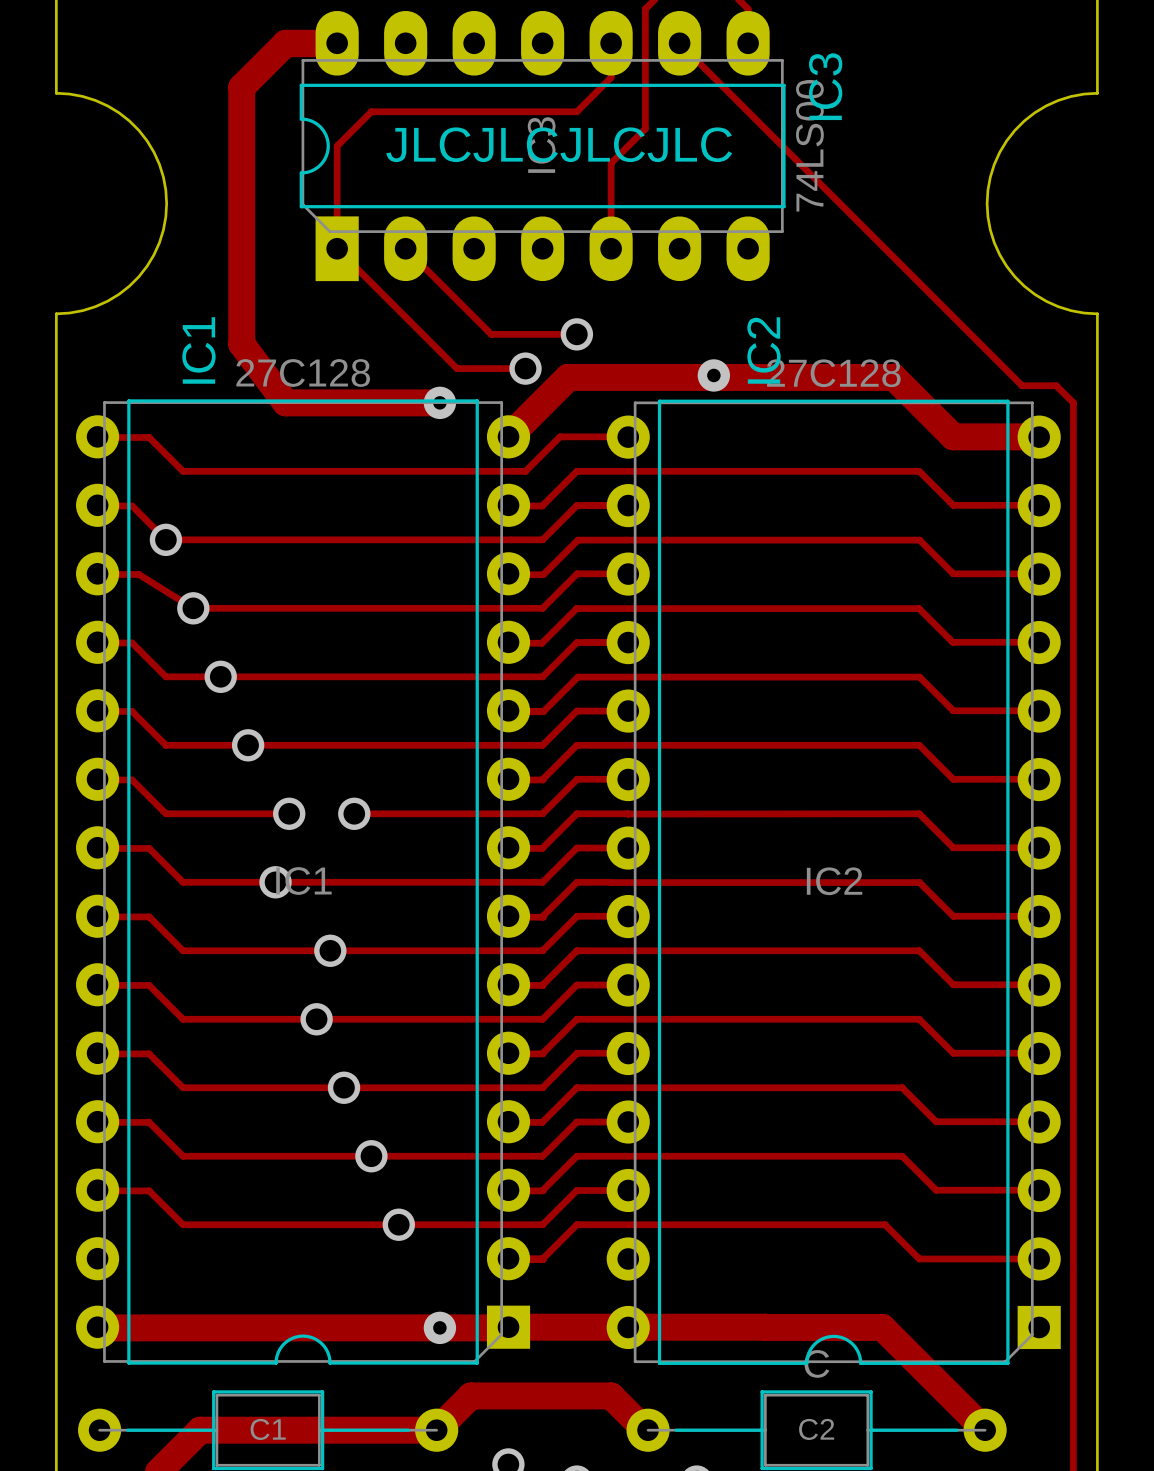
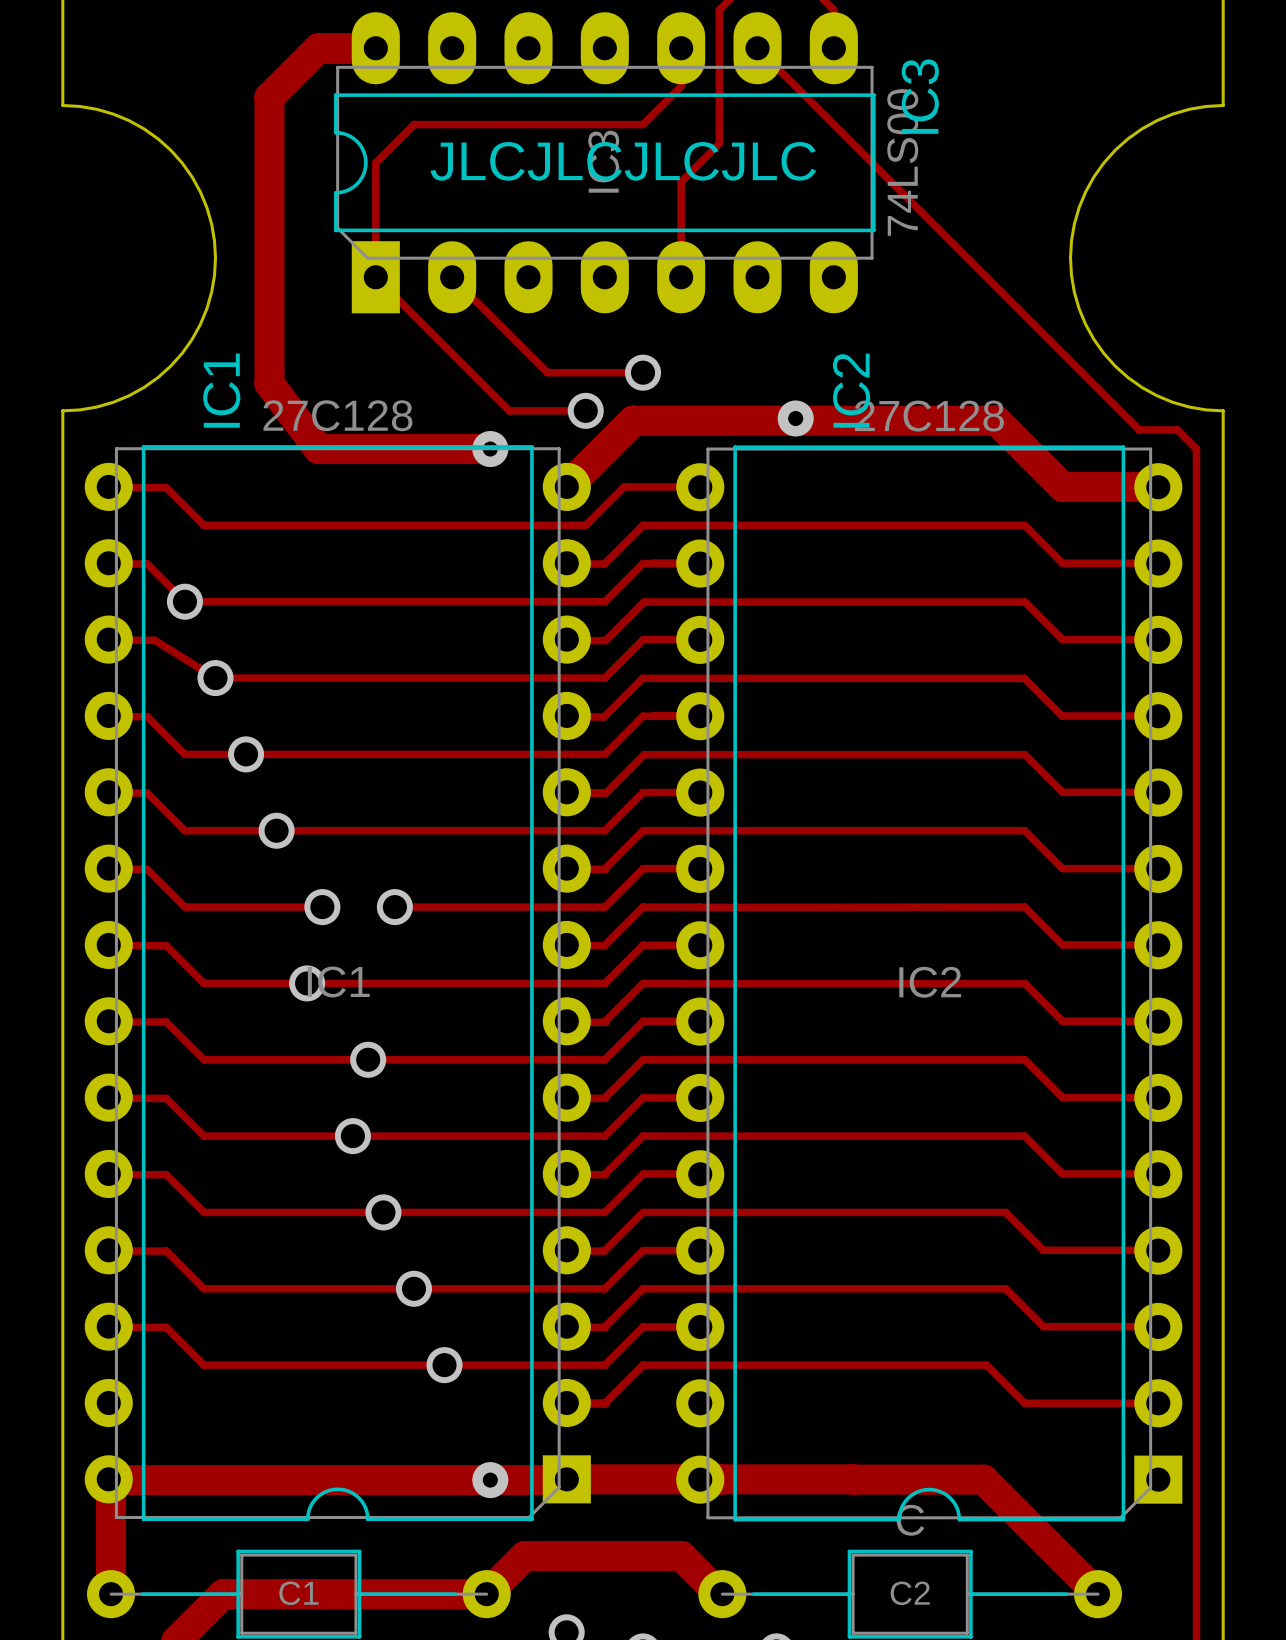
board edge: (56, 93) (82, 96) (107, 105) (119, 112) (138, 130) (154, 152) (159, 164) (163, 177) (166, 203) (163, 229) (159, 242) (154, 254) (138, 276) (119, 294) (107, 301) (82, 310) (56, 313) (56, 368) -> (62, 103) (62, 105) (96, 109) (129, 120) (144, 128) (170, 150) (182, 162) (200, 191) (211, 224) (215, 258) (211, 292) (200, 324) (182, 353) (170, 366) (144, 387) (129, 395) (96, 407) (62, 410)
board edge: (1097, 93) (1071, 96) (1046, 105) (1034, 112) (1014, 130) (999, 152) (994, 164) (990, 177) (987, 203) (990, 229) (994, 242) (999, 254) (1014, 276) (1024, 286) (1046, 301) (1071, 310) (1097, 313) (1097, 368) -> (1223, 103) (1223, 105) (1189, 109) (1156, 120) (1128, 138) (1115, 150) (1103, 162) (1085, 191) (1074, 224) (1070, 258) (1074, 292) (1085, 324) (1103, 353) (1115, 366) (1141, 387) (1156, 395) (1189, 407) (1223, 410)
track: none -> (111, 1482) (111, 1594)

